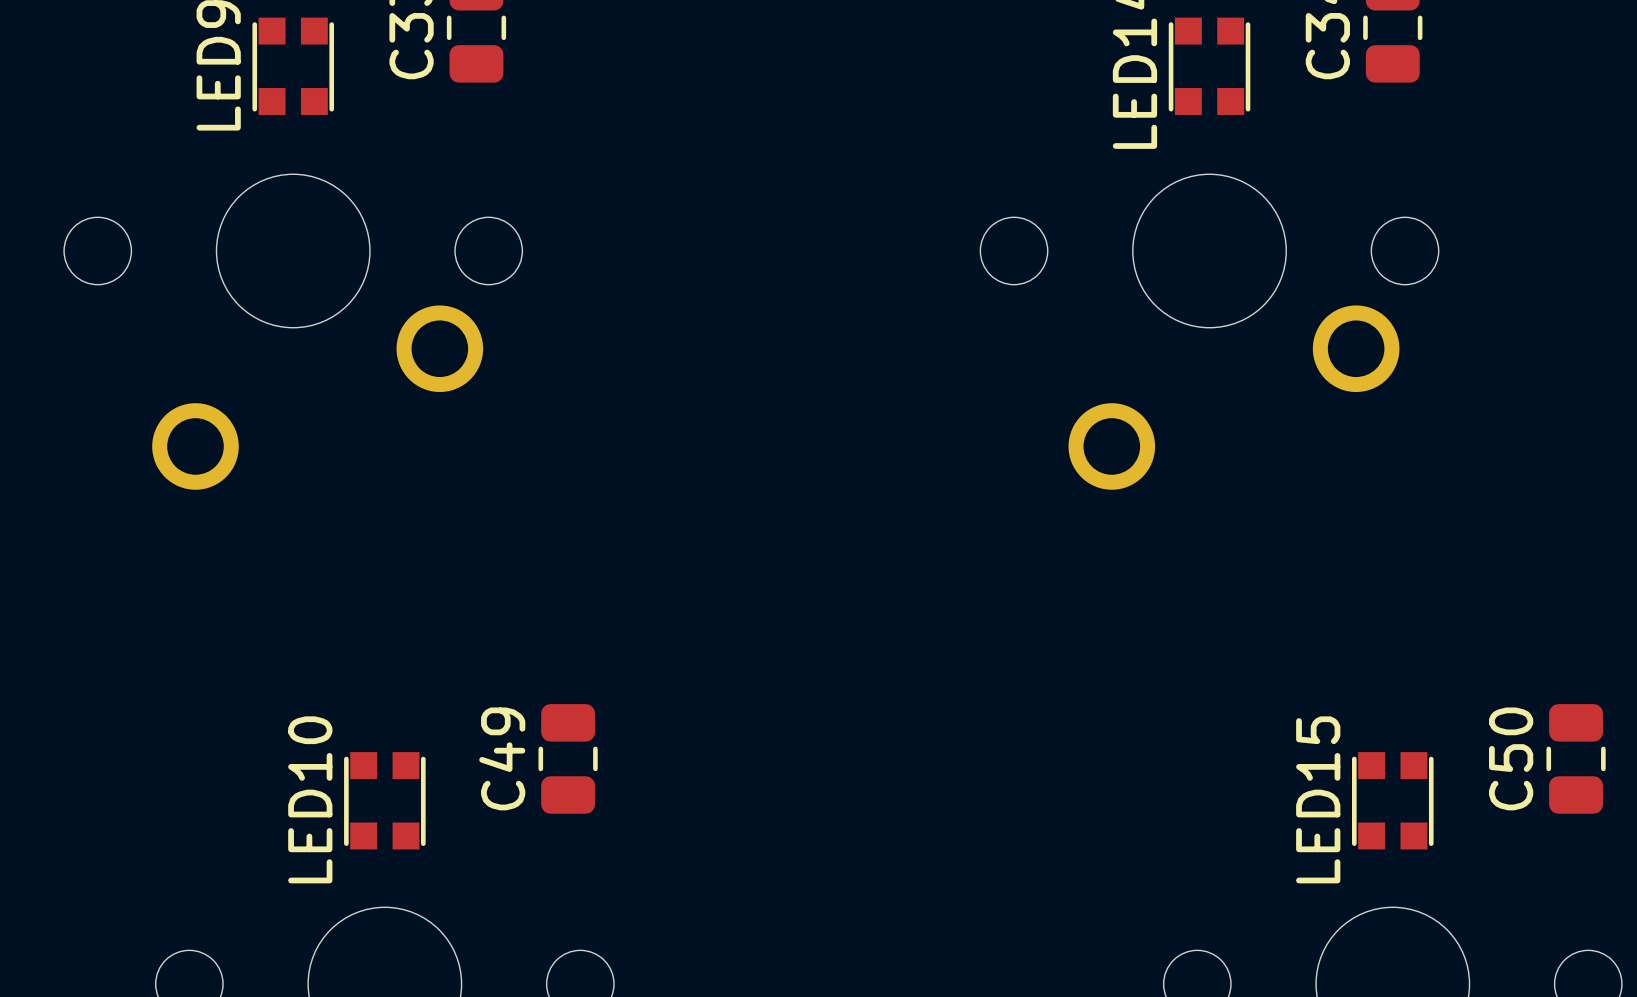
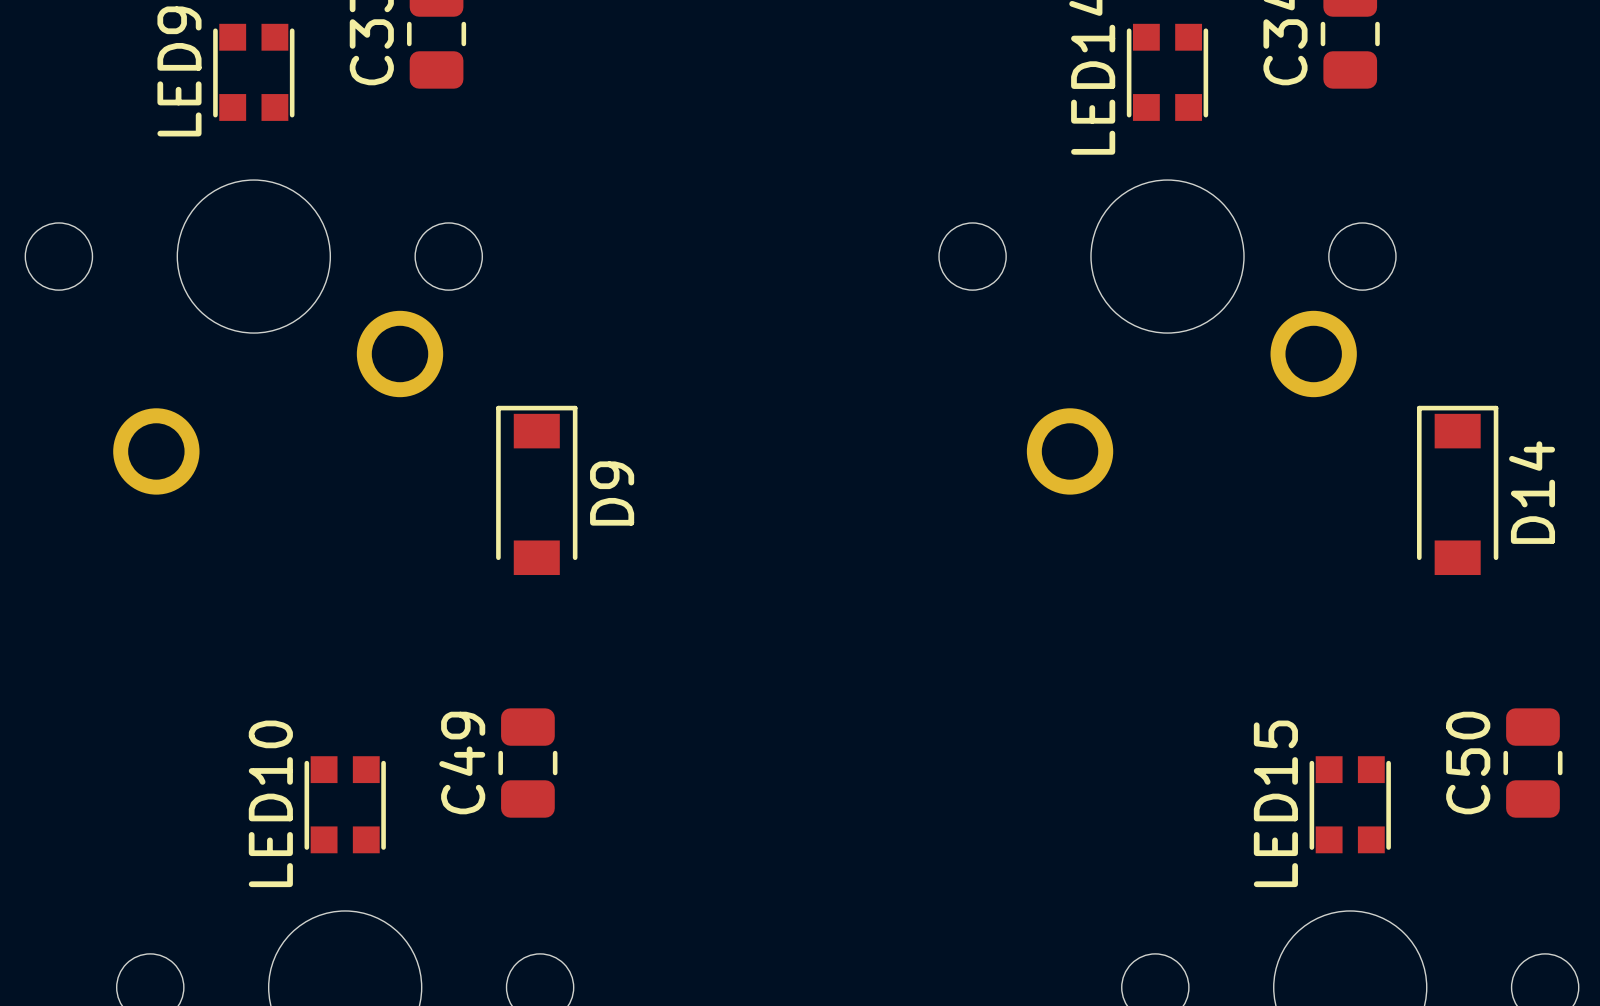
D9: none -> (536, 490)
D14: none -> (1457, 490)

